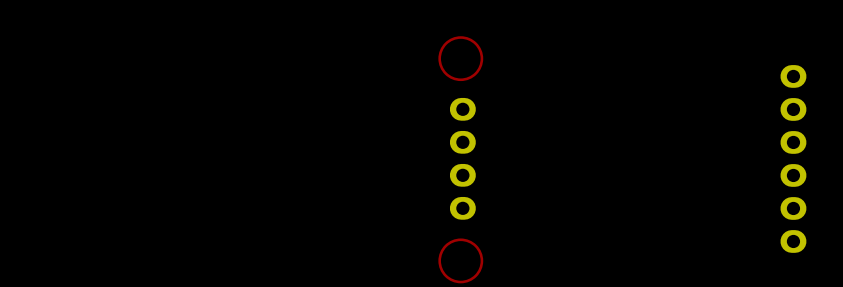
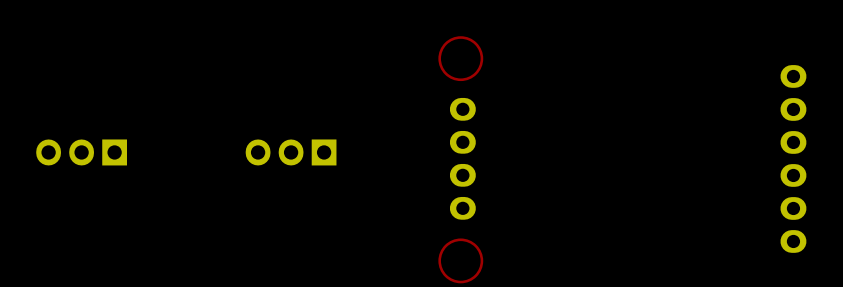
part: none -> (81, 152)
part: none -> (291, 152)

